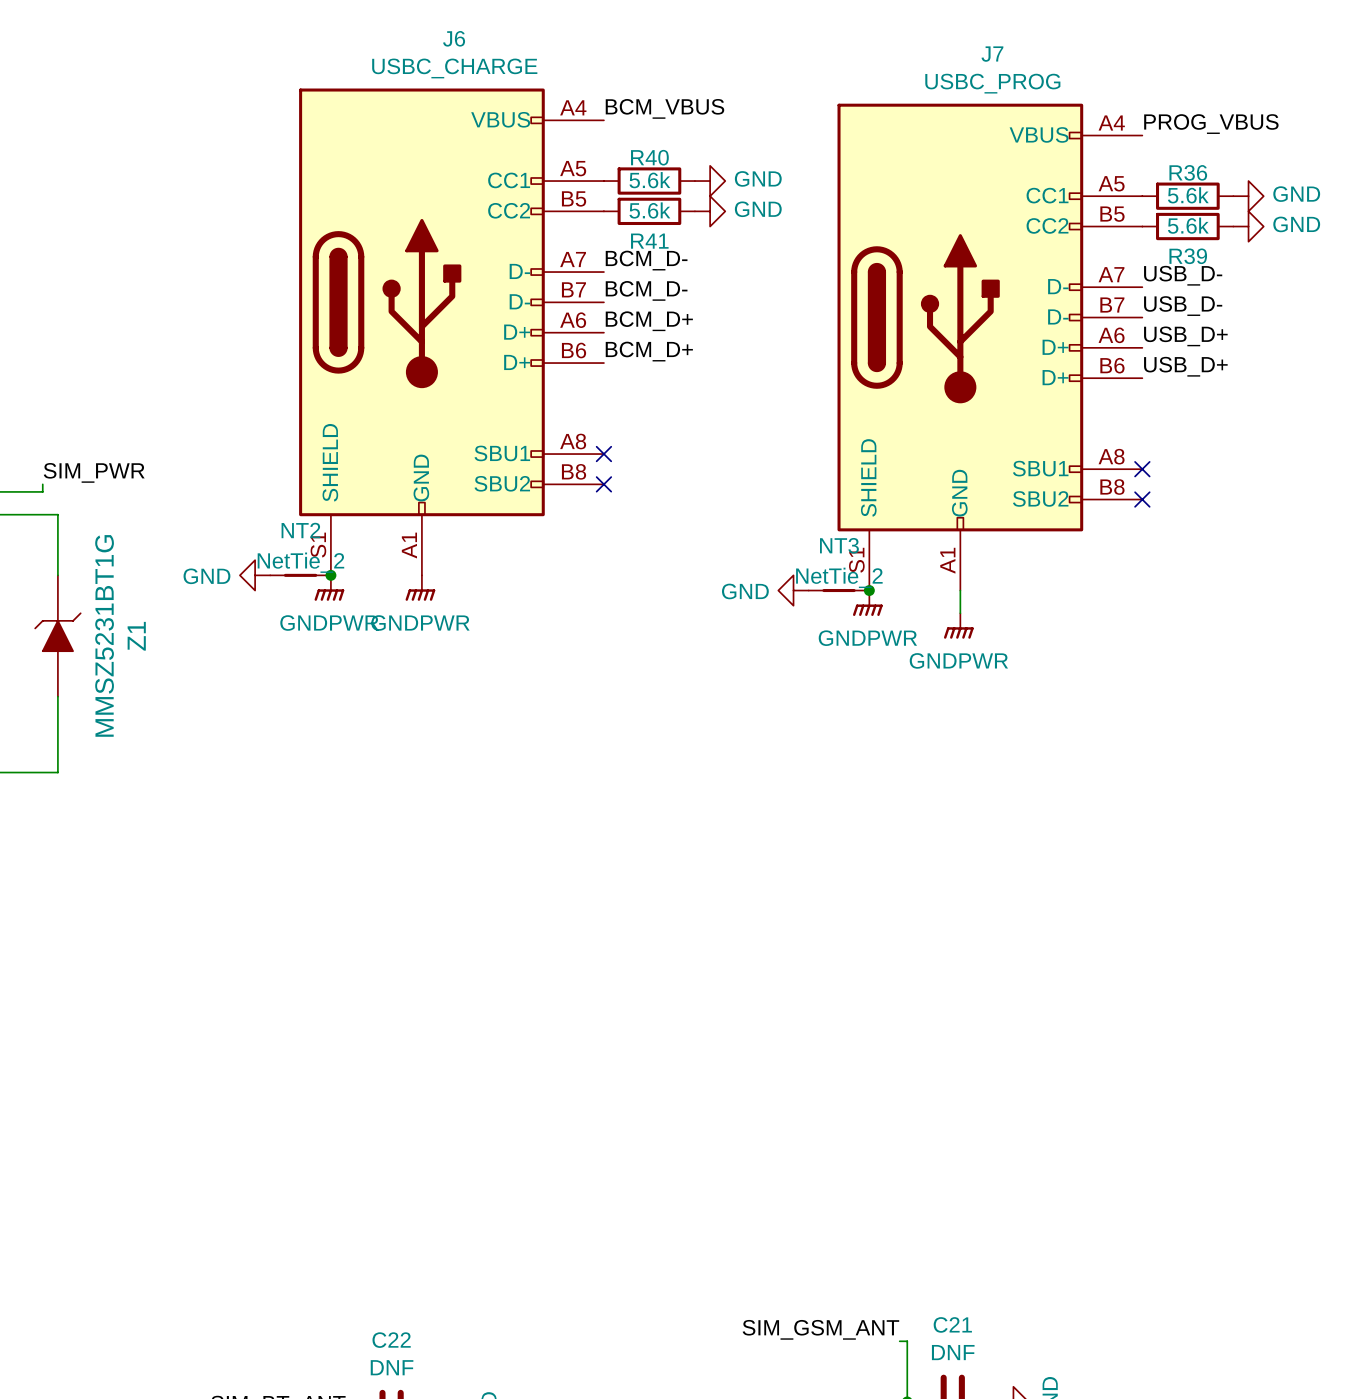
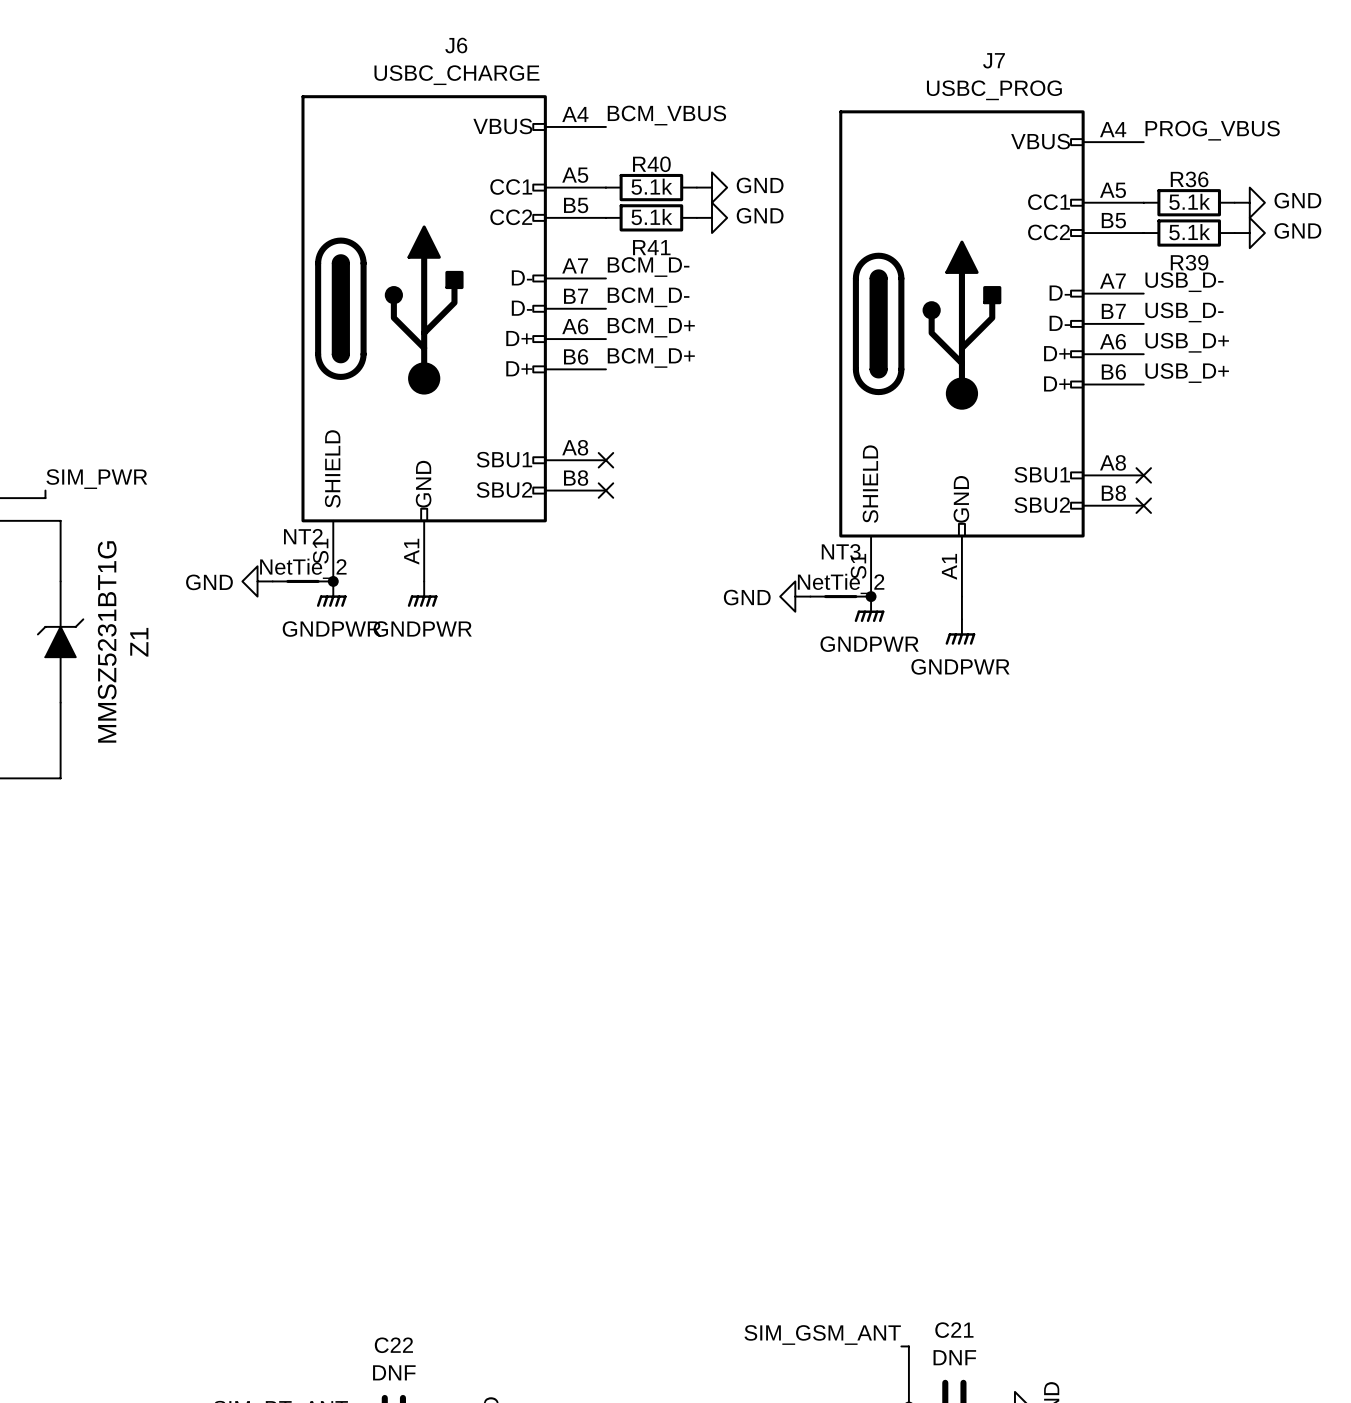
R40 value: 5.6k (649, 180) -> 5.1k (651, 186)
R36 value: 5.6k (1188, 195) -> 5.1k (1189, 201)
R41 value: 5.6k (649, 210) -> 5.1k (651, 217)
R39 value: 5.6k (1188, 225) -> 5.1k (1189, 232)

